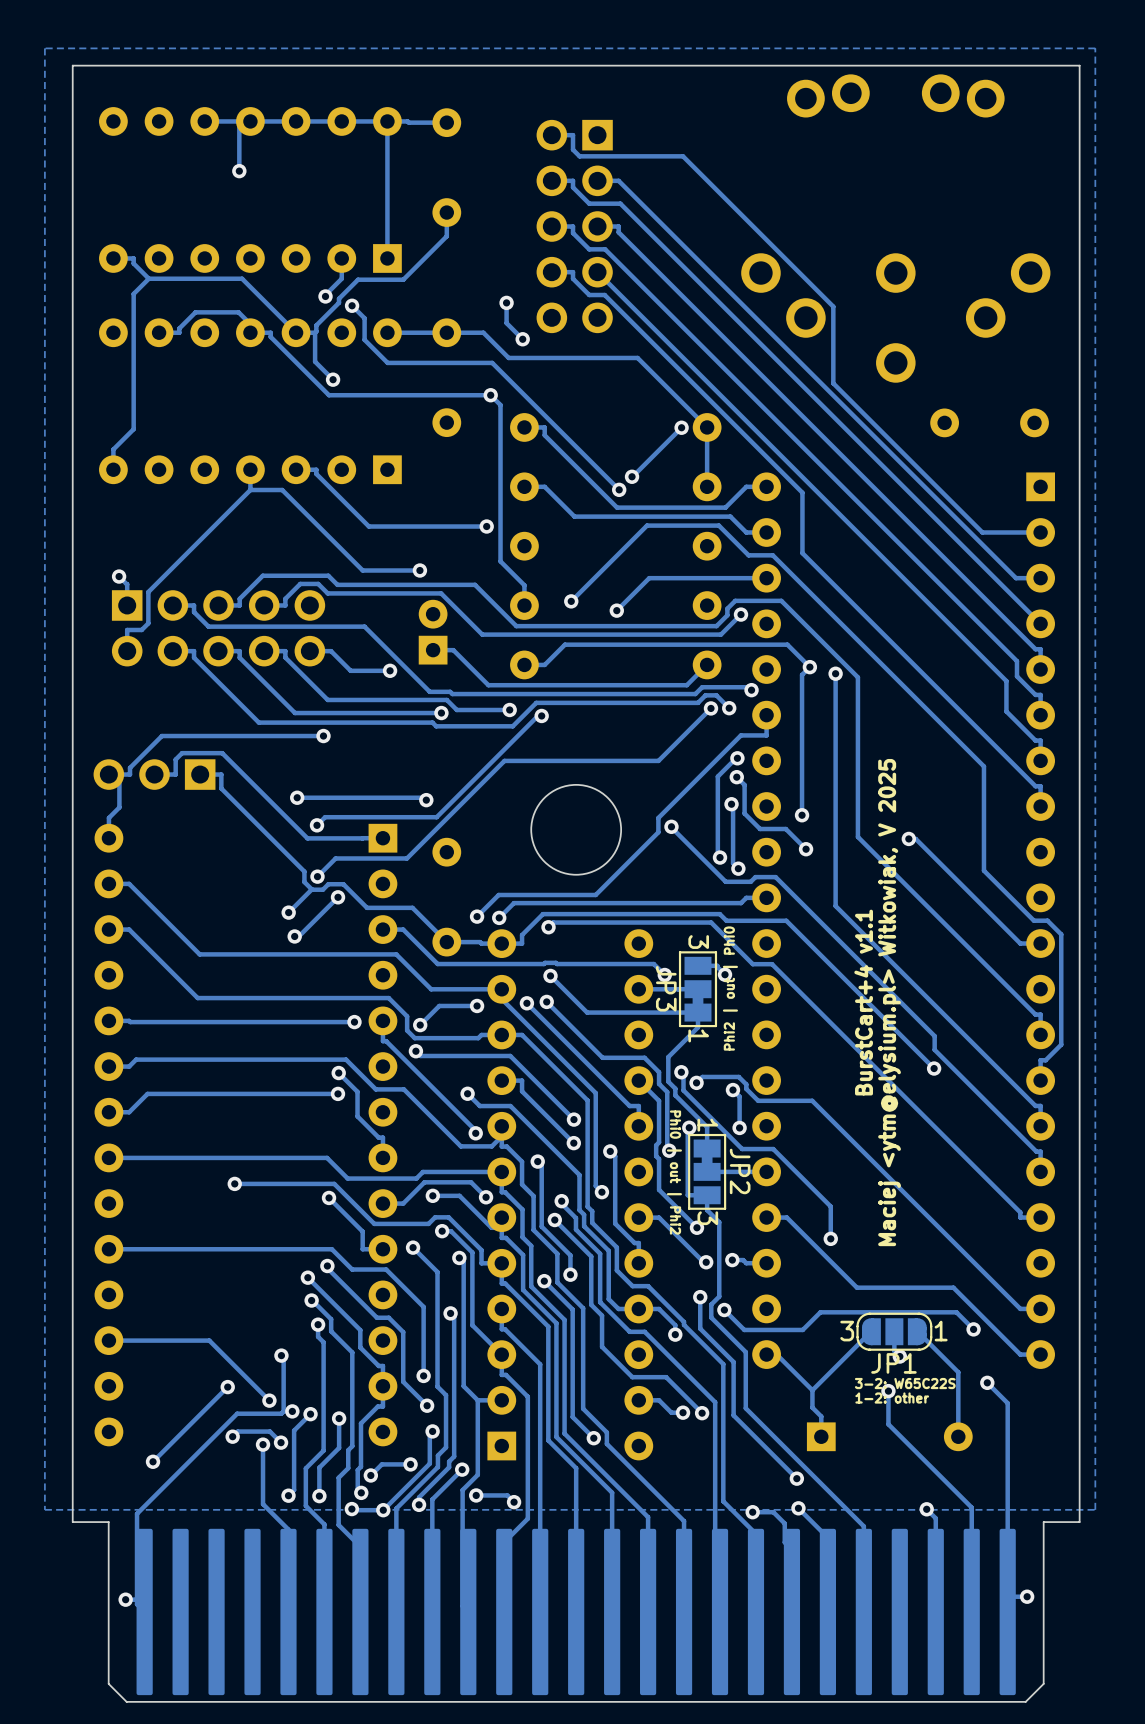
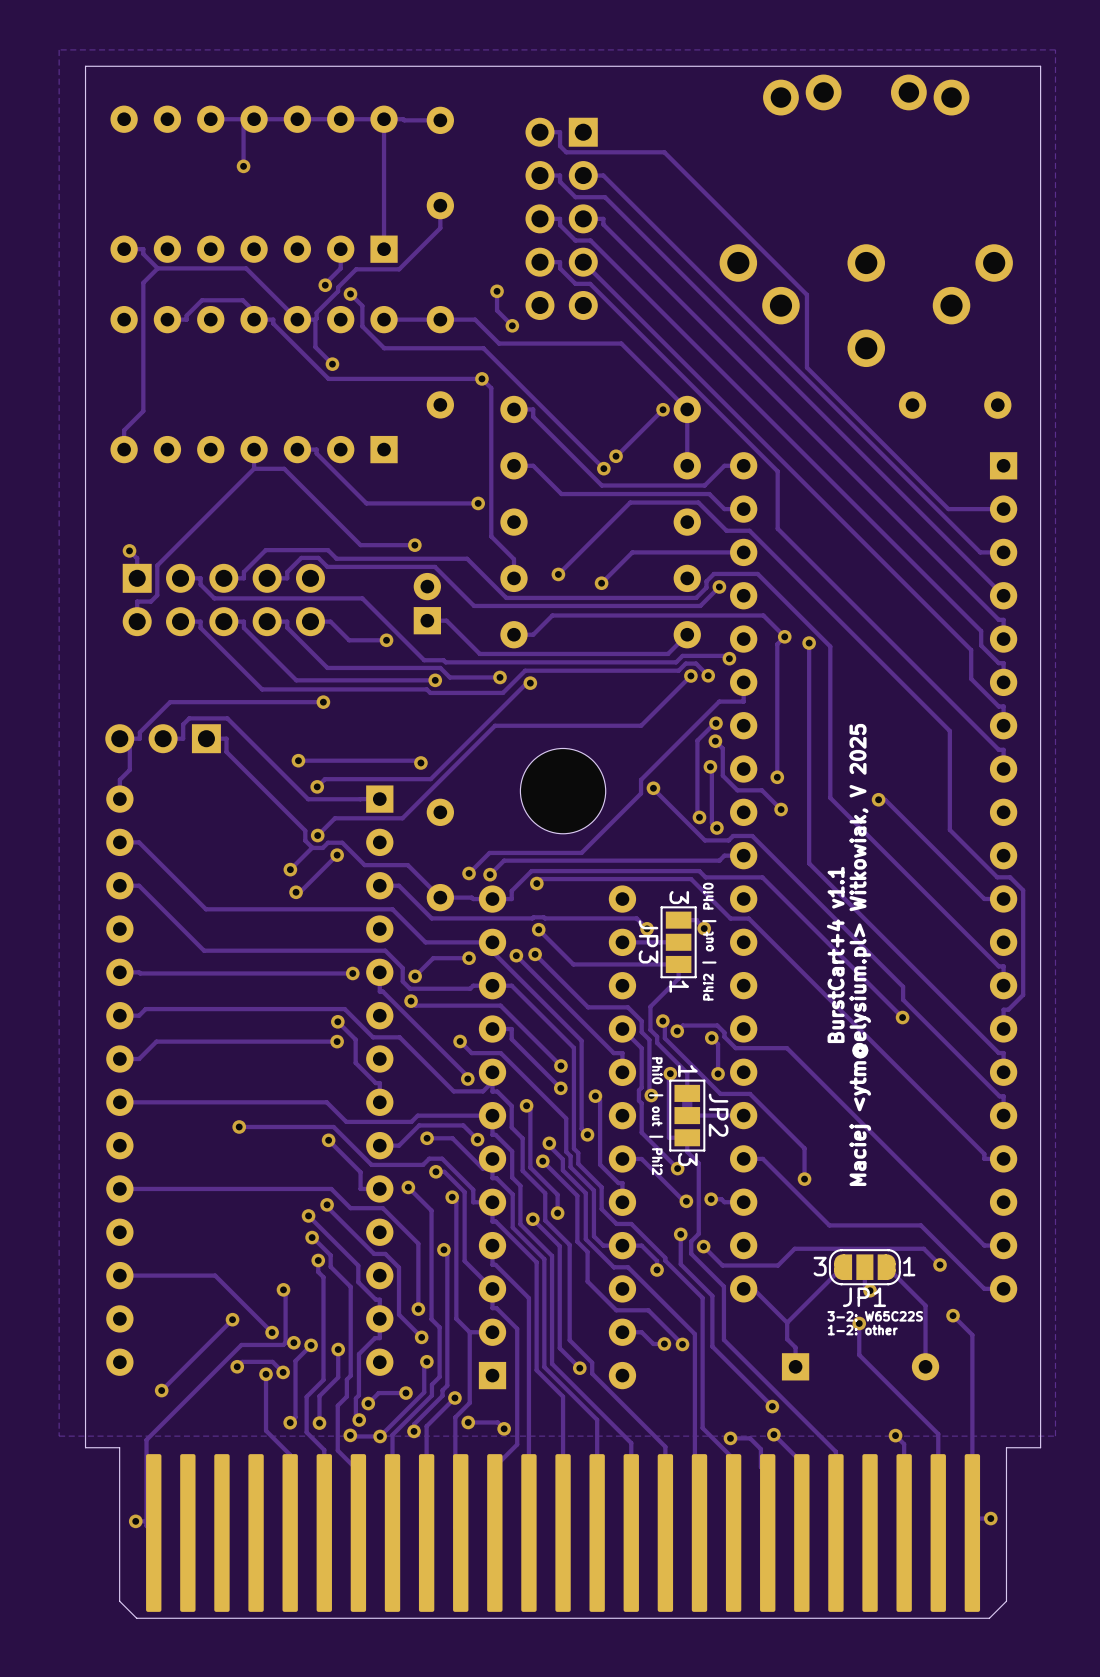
JP3 footprint: [678, 951, 718, 1028] -> [660, 906, 697, 979]

